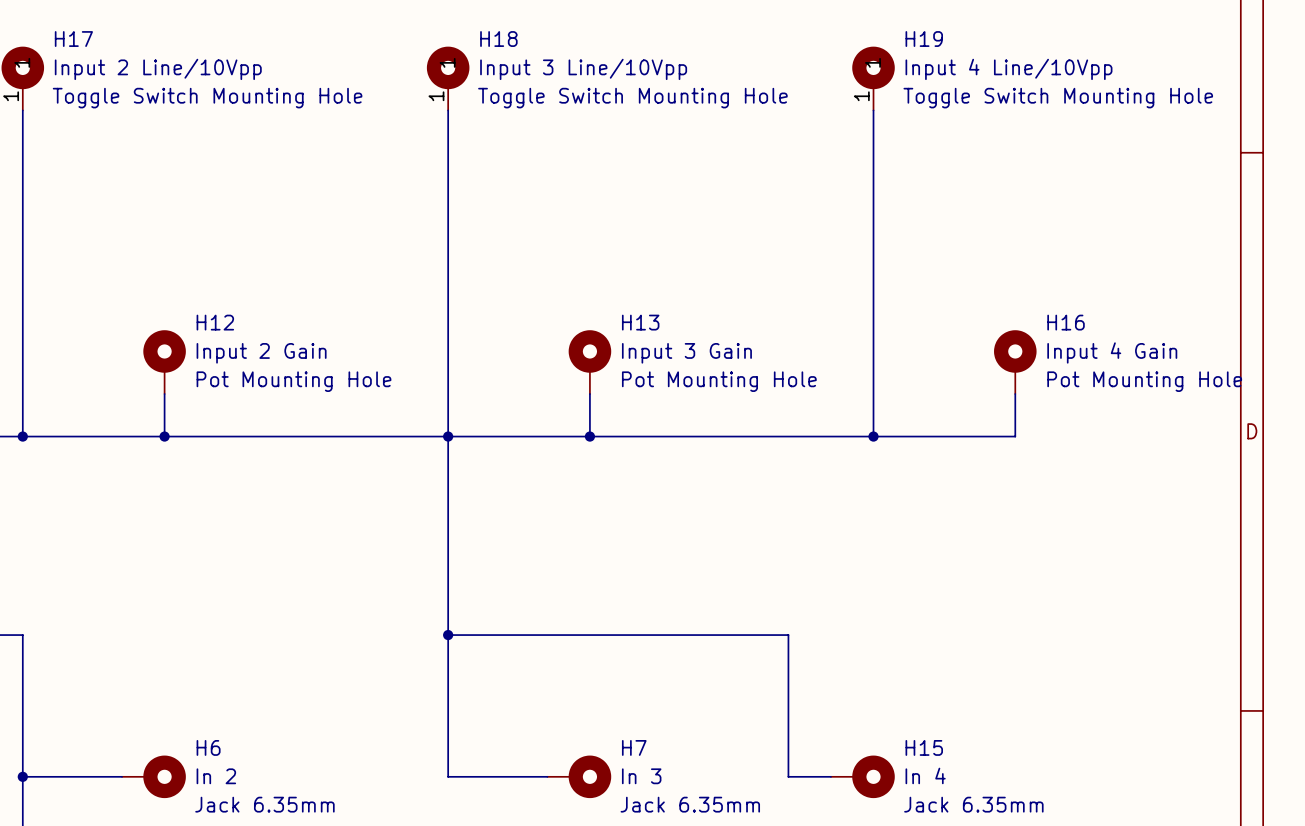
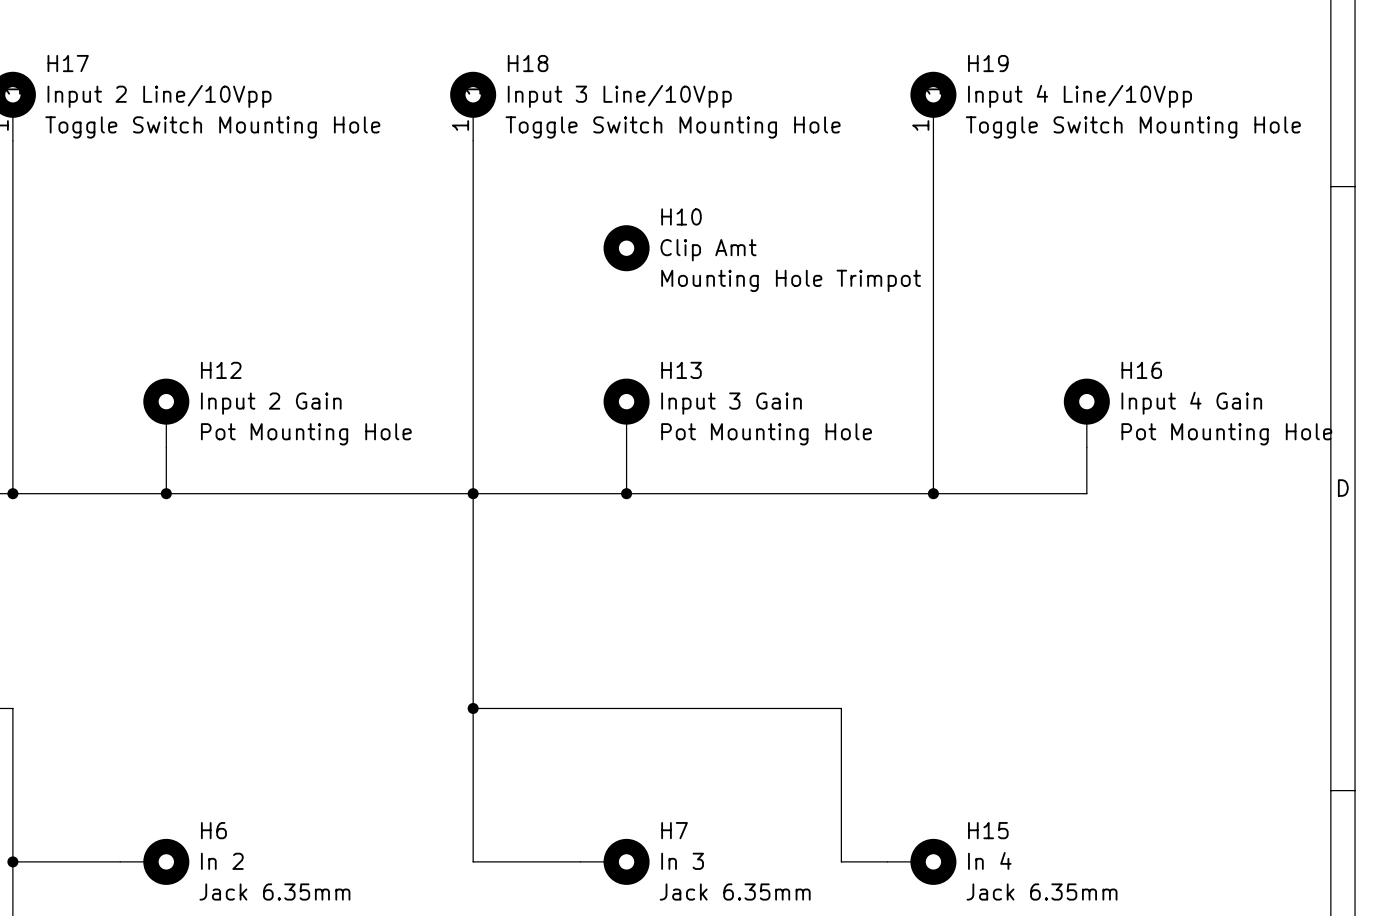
H10: none -> Clip Amt (626, 248)

